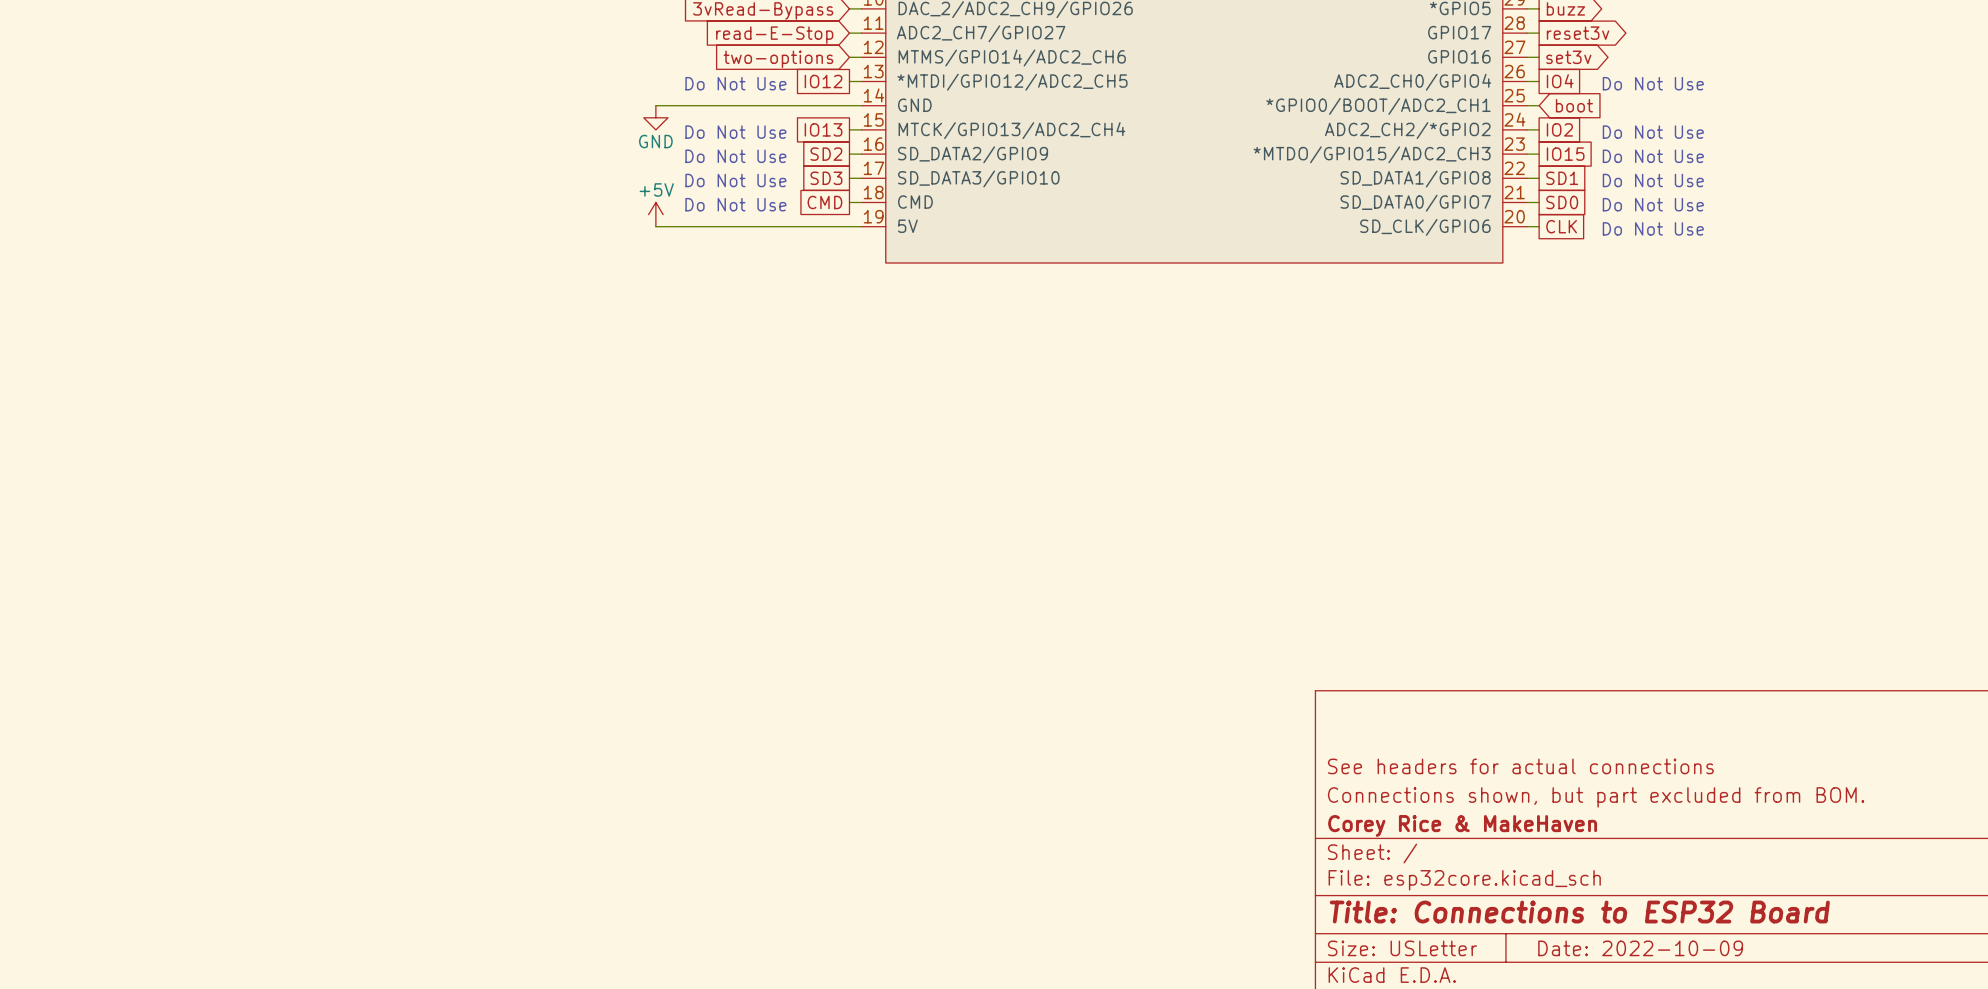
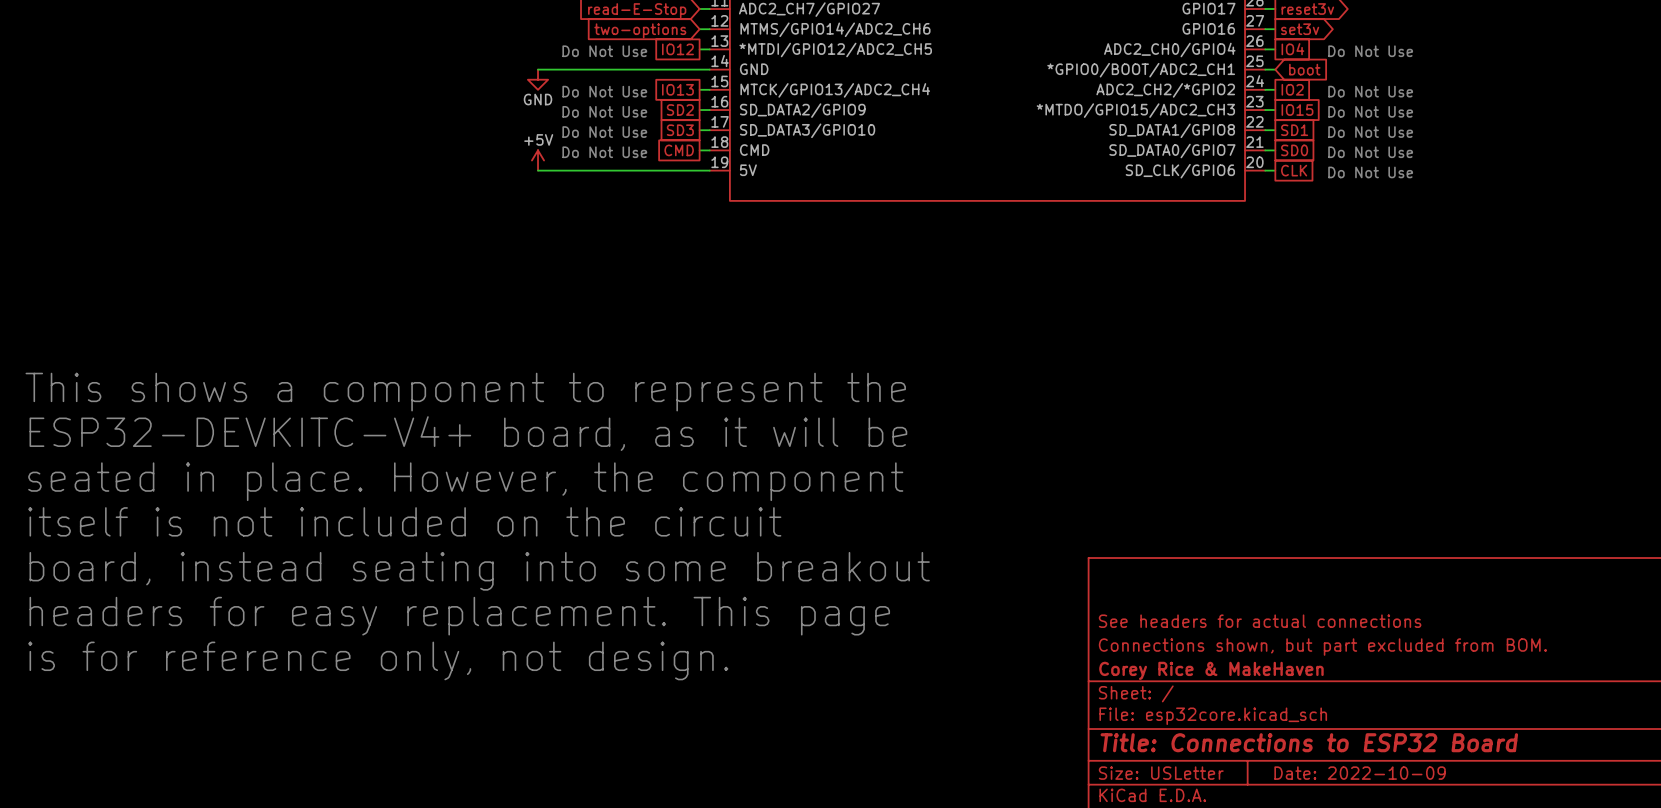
text: none -> This shows a component to represent the (465, 392)
text: none -> ESP32-DEVKITC-V4+ board, as it will be (468, 433)
text: none -> seated in place. However, the component (465, 481)
text: none -> itself is not included on the circuit (404, 521)
text: none -> board, instead seating into some breakout (479, 571)
text: none -> headers for easy replacement. This page (459, 616)
text: none -> is for reference only, not design. (378, 660)

